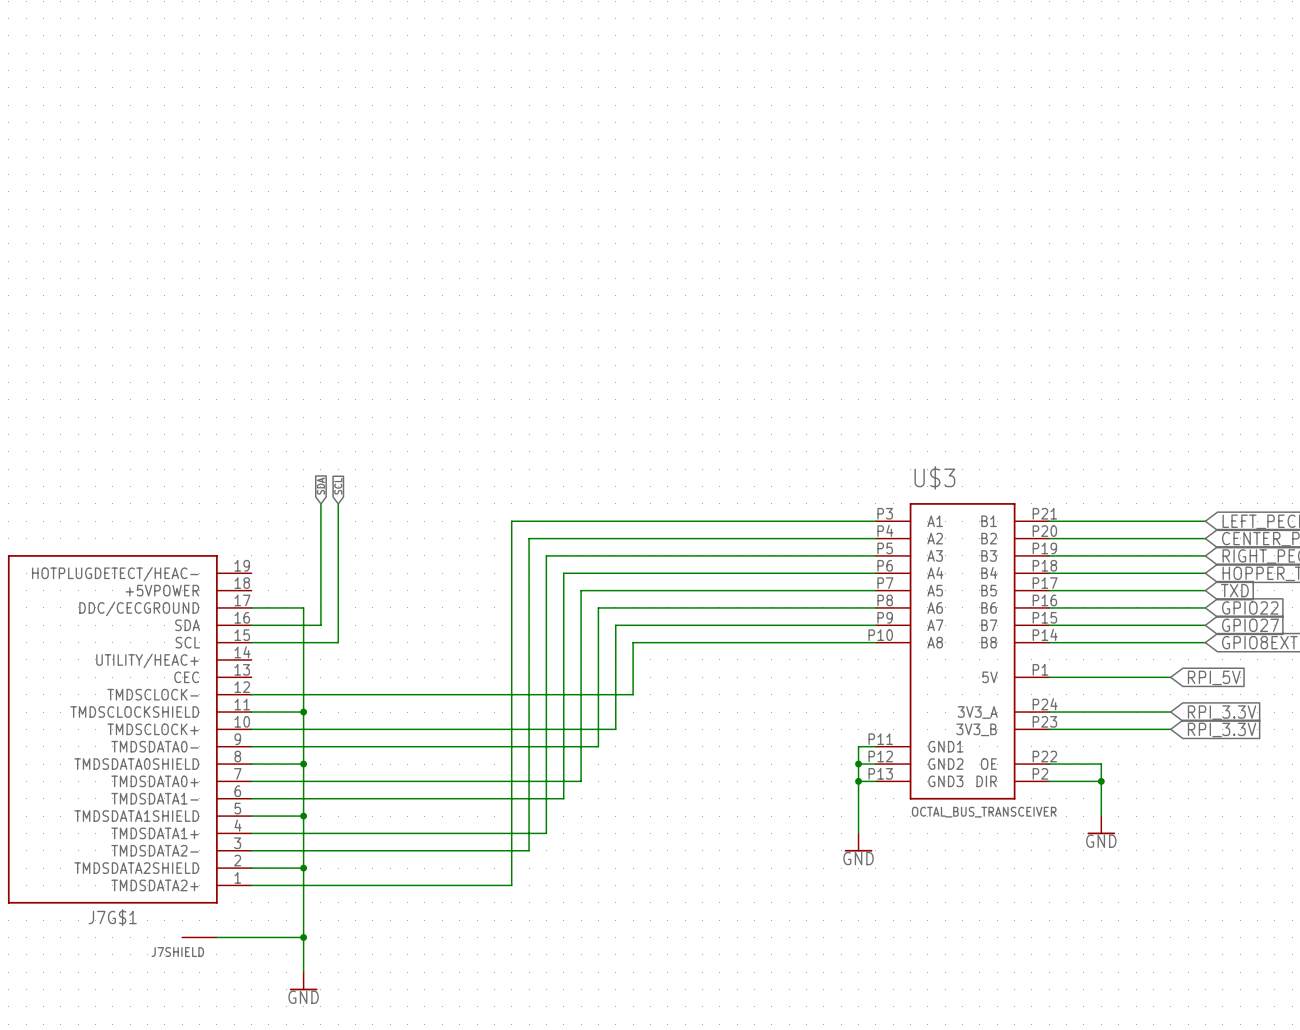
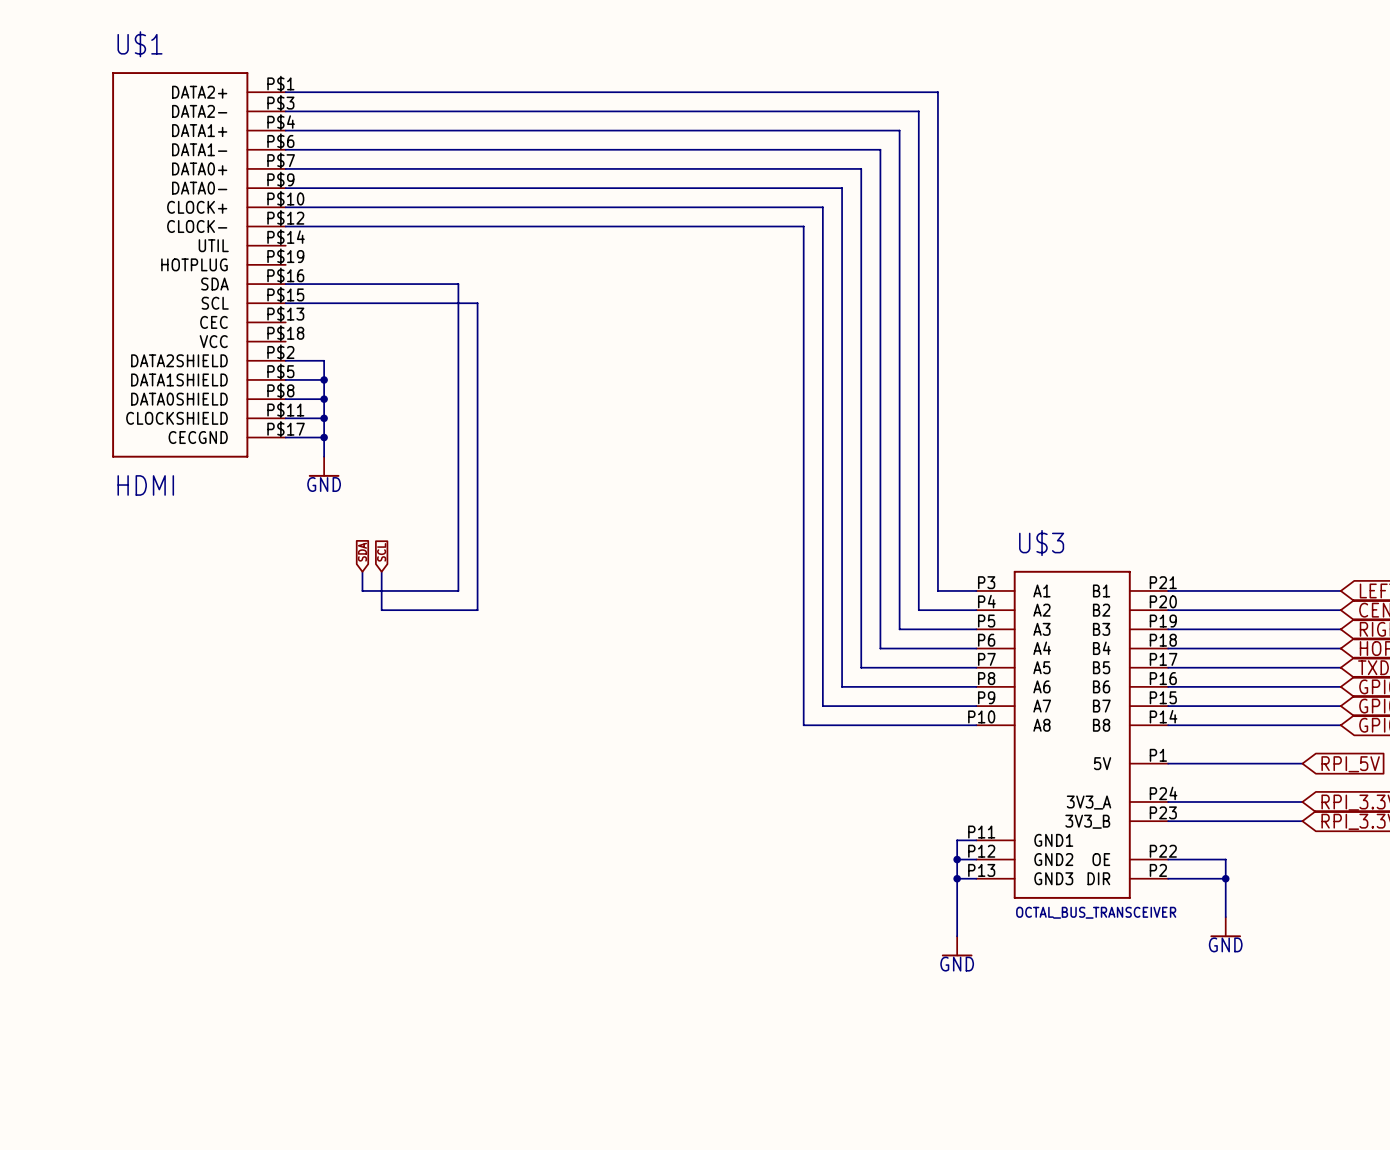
U$1: none -> HDMI (198, 264)
wire: none -> (285, 360) (324, 360) (324, 456)
wire: none -> (285, 379) (324, 379)
junction: none -> (324, 379)
wire: none -> (285, 399) (324, 399)
junction: none -> (324, 399)
wire: none -> (285, 418) (324, 418)
junction: none -> (324, 418)
wire: none -> (285, 437) (324, 437)
junction: none -> (324, 437)
power symbol: none -> GND (324, 466)
wire: (320, 521) (320, 625) (251, 625) -> (362, 590) (458, 590) (458, 284) (285, 284)
wire: (841, 521) (511, 521) (511, 885) (251, 885) -> (937, 590) (937, 92) (285, 92)
wire: (338, 538) (338, 642) (251, 642) -> (381, 610) (477, 610) (477, 303) (285, 303)
wire: (823, 538) (529, 538) (529, 850) (251, 850) -> (918, 610) (918, 111) (285, 111)
wire: (806, 555) (546, 555) (546, 833) (251, 833) -> (899, 629) (899, 130) (285, 130)
wire: (789, 573) (563, 573) (563, 798) (251, 798) -> (880, 648) (880, 149) (285, 149)
wire: (771, 590) (581, 590) (581, 781) (251, 781) -> (861, 667) (861, 168) (285, 168)
wire: (251, 607) (303, 607) (303, 972) -> none
wire: (754, 607) (598, 607) (598, 746) (251, 746) -> (842, 686) (842, 188) (285, 188)
wire: (737, 625) (615, 625) (615, 729) (251, 729) -> (822, 706) (822, 207) (285, 207)
wire: (719, 642) (633, 642) (633, 694) (251, 694) -> (803, 725) (803, 226) (285, 226)
wire: (251, 712) (303, 712) -> none
junction: (303, 712) -> none
J7G$1: (129, 729) -> none
wire: (251, 764) (303, 764) -> none
junction: (303, 764) -> none
wire: (251, 816) (303, 816) -> none
junction: (303, 816) -> none
wire: (251, 868) (303, 868) -> none
junction: (303, 868) -> none
J7SHIELD: (199, 937) -> none
wire: (216, 937) (303, 937) -> none
junction: (303, 937) -> none
power symbol: GND (303, 981) -> none

